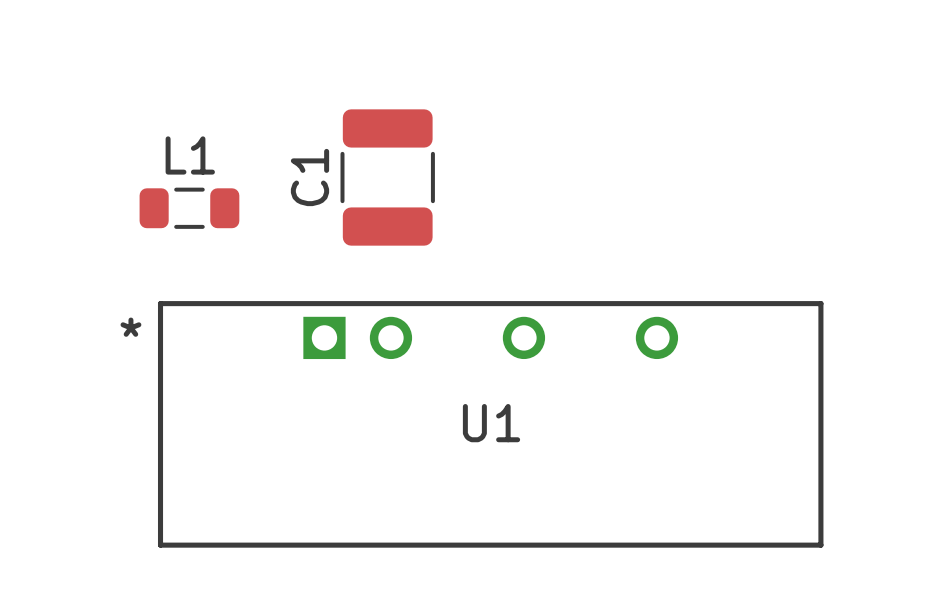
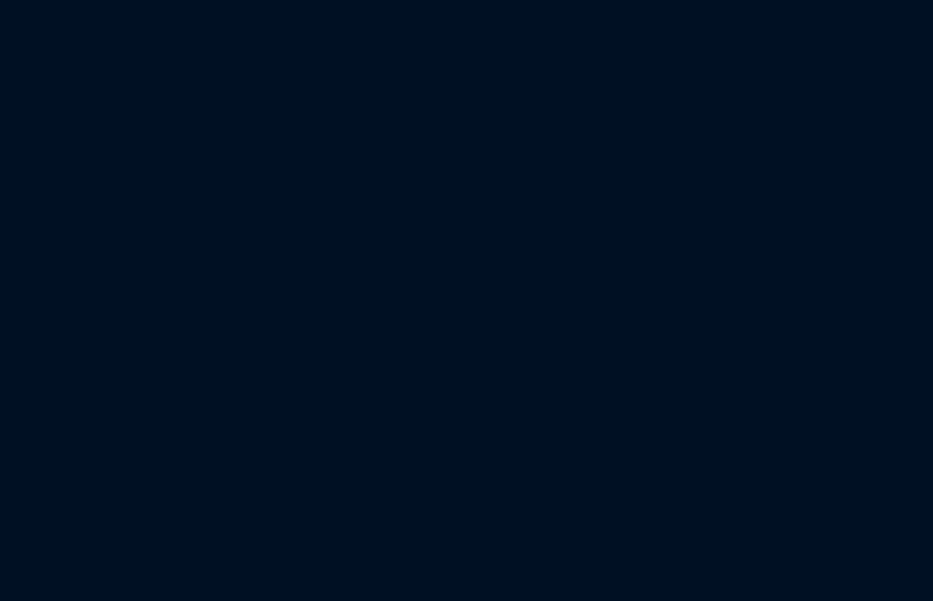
C1: (387, 177) -> none
L1: (189, 208) -> none
U1: (490, 424) -> none

